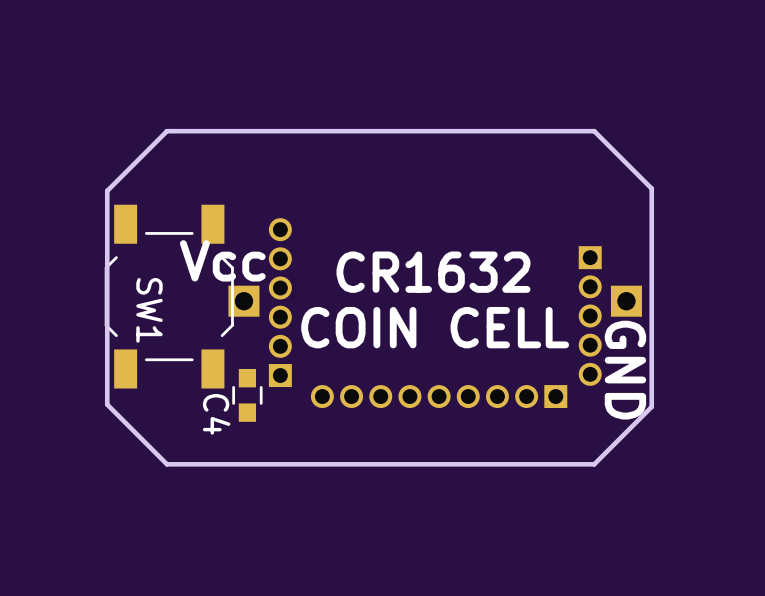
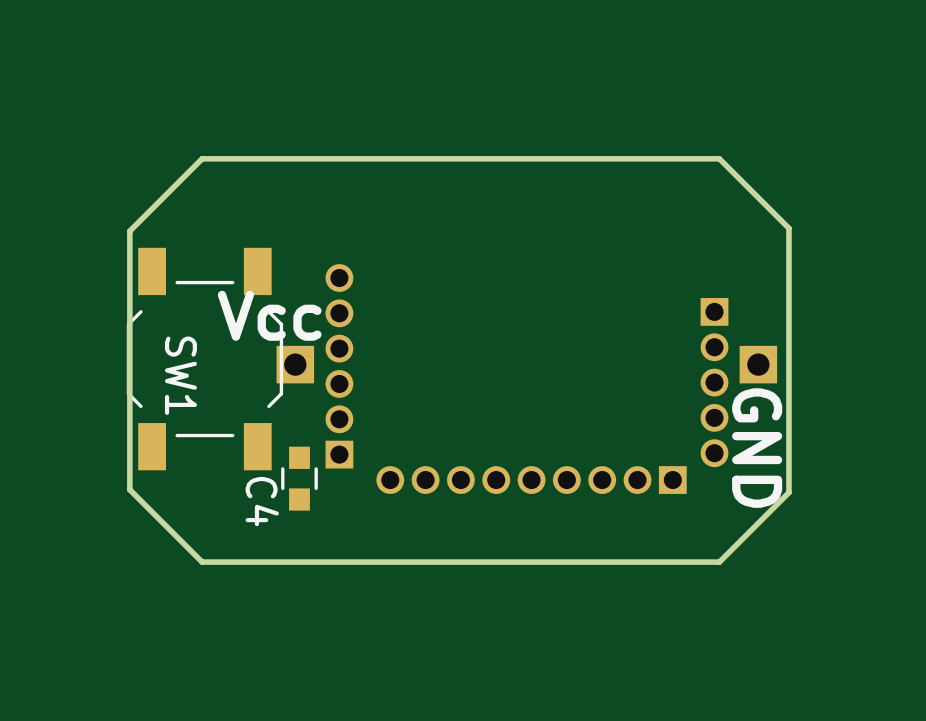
text: CR1632 (433, 272) -> none
text: COIN CELL (435, 327) -> none

